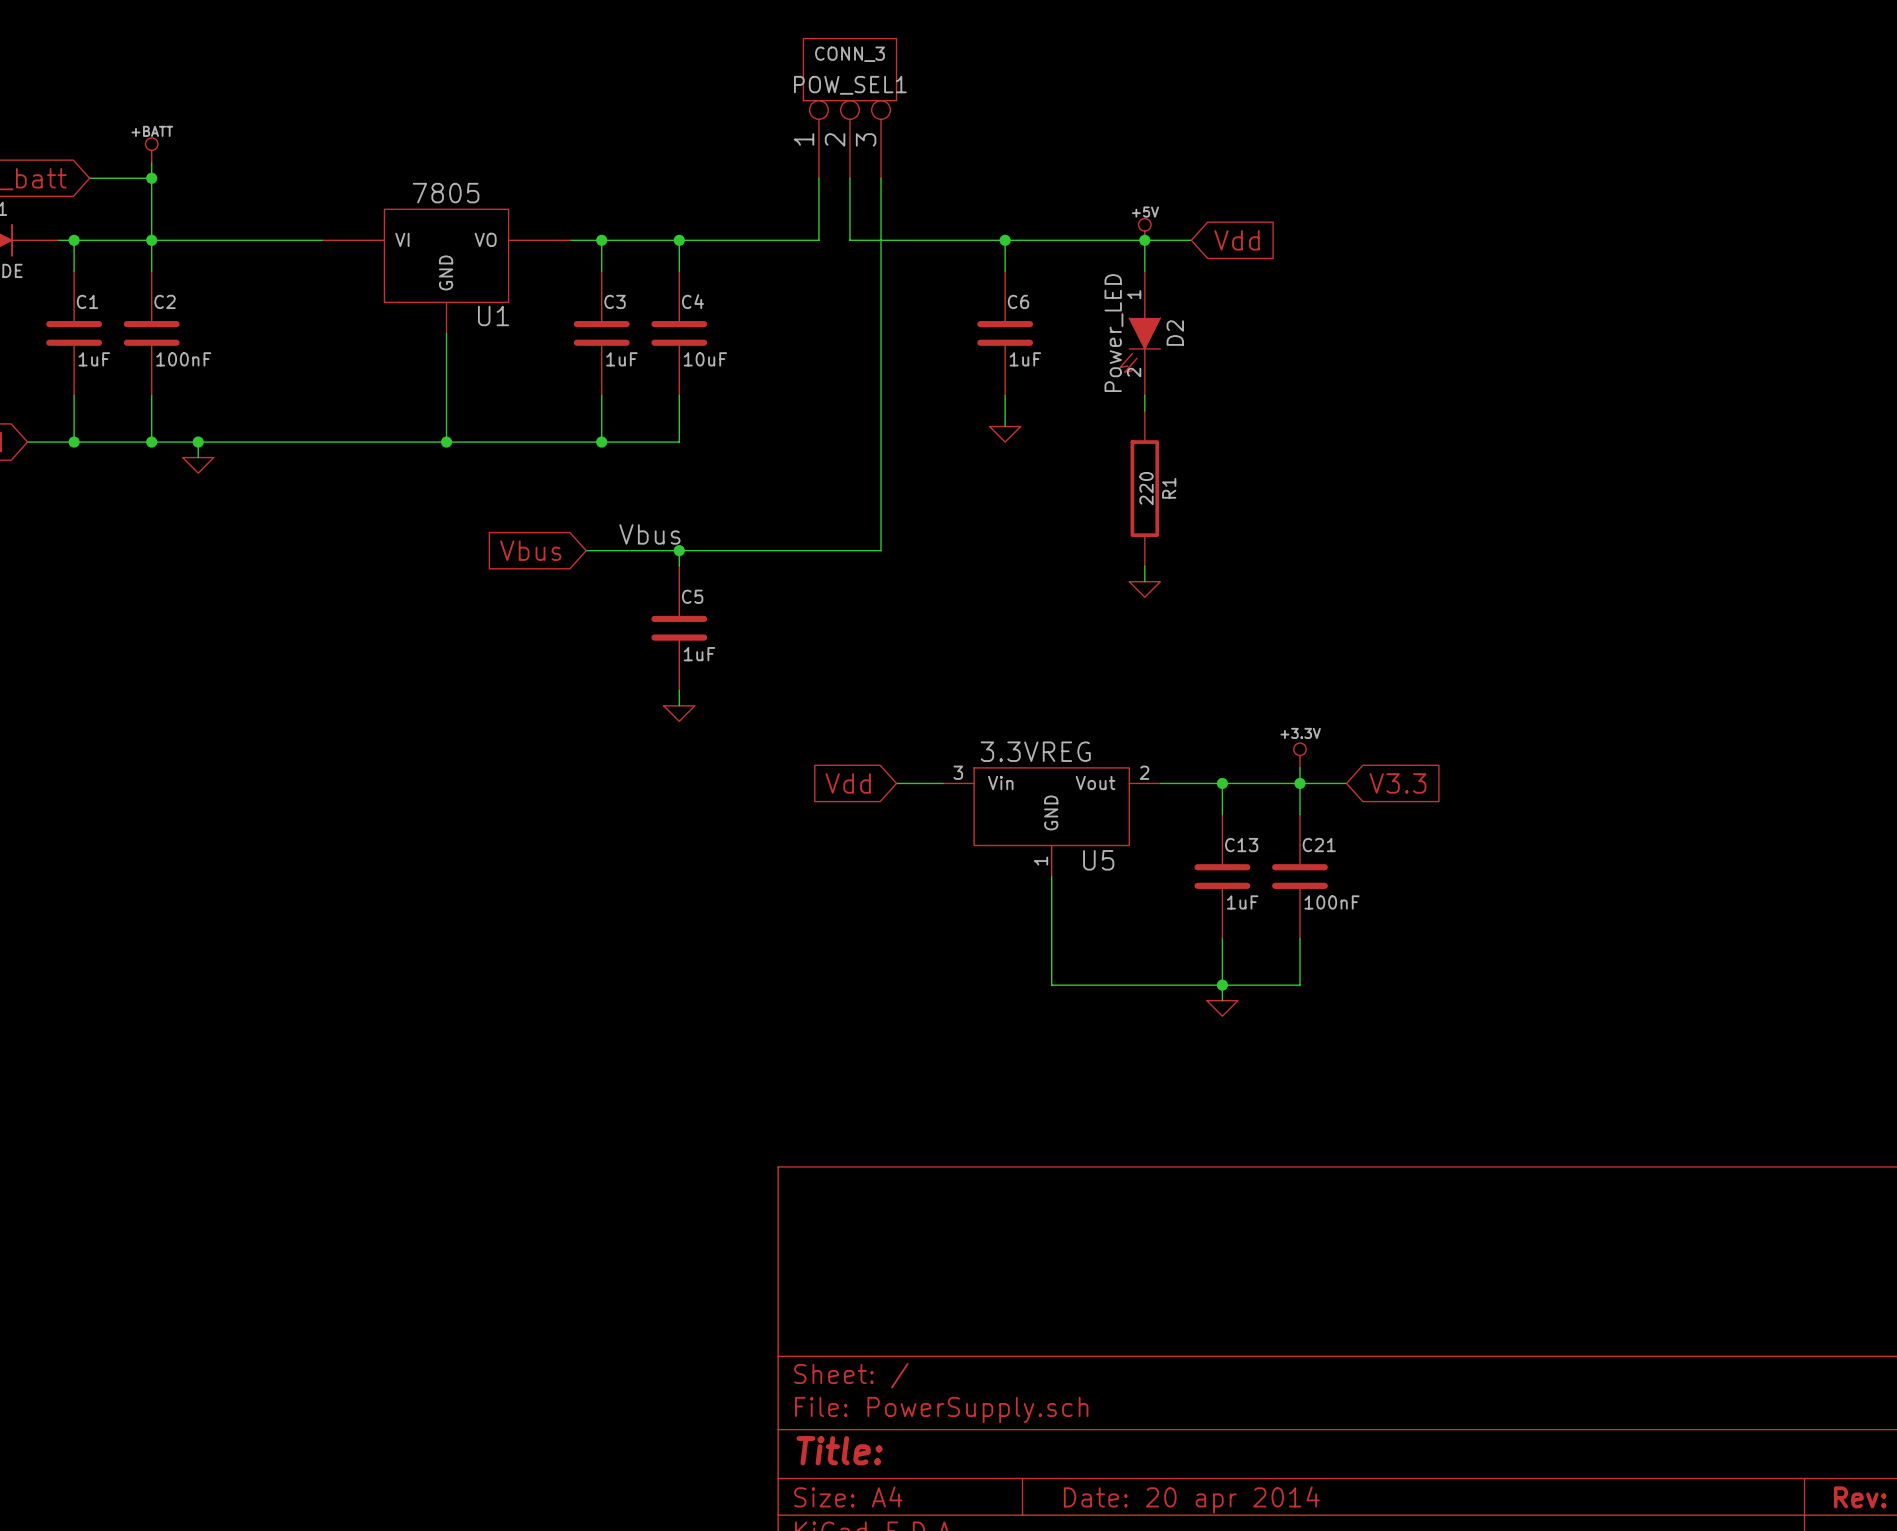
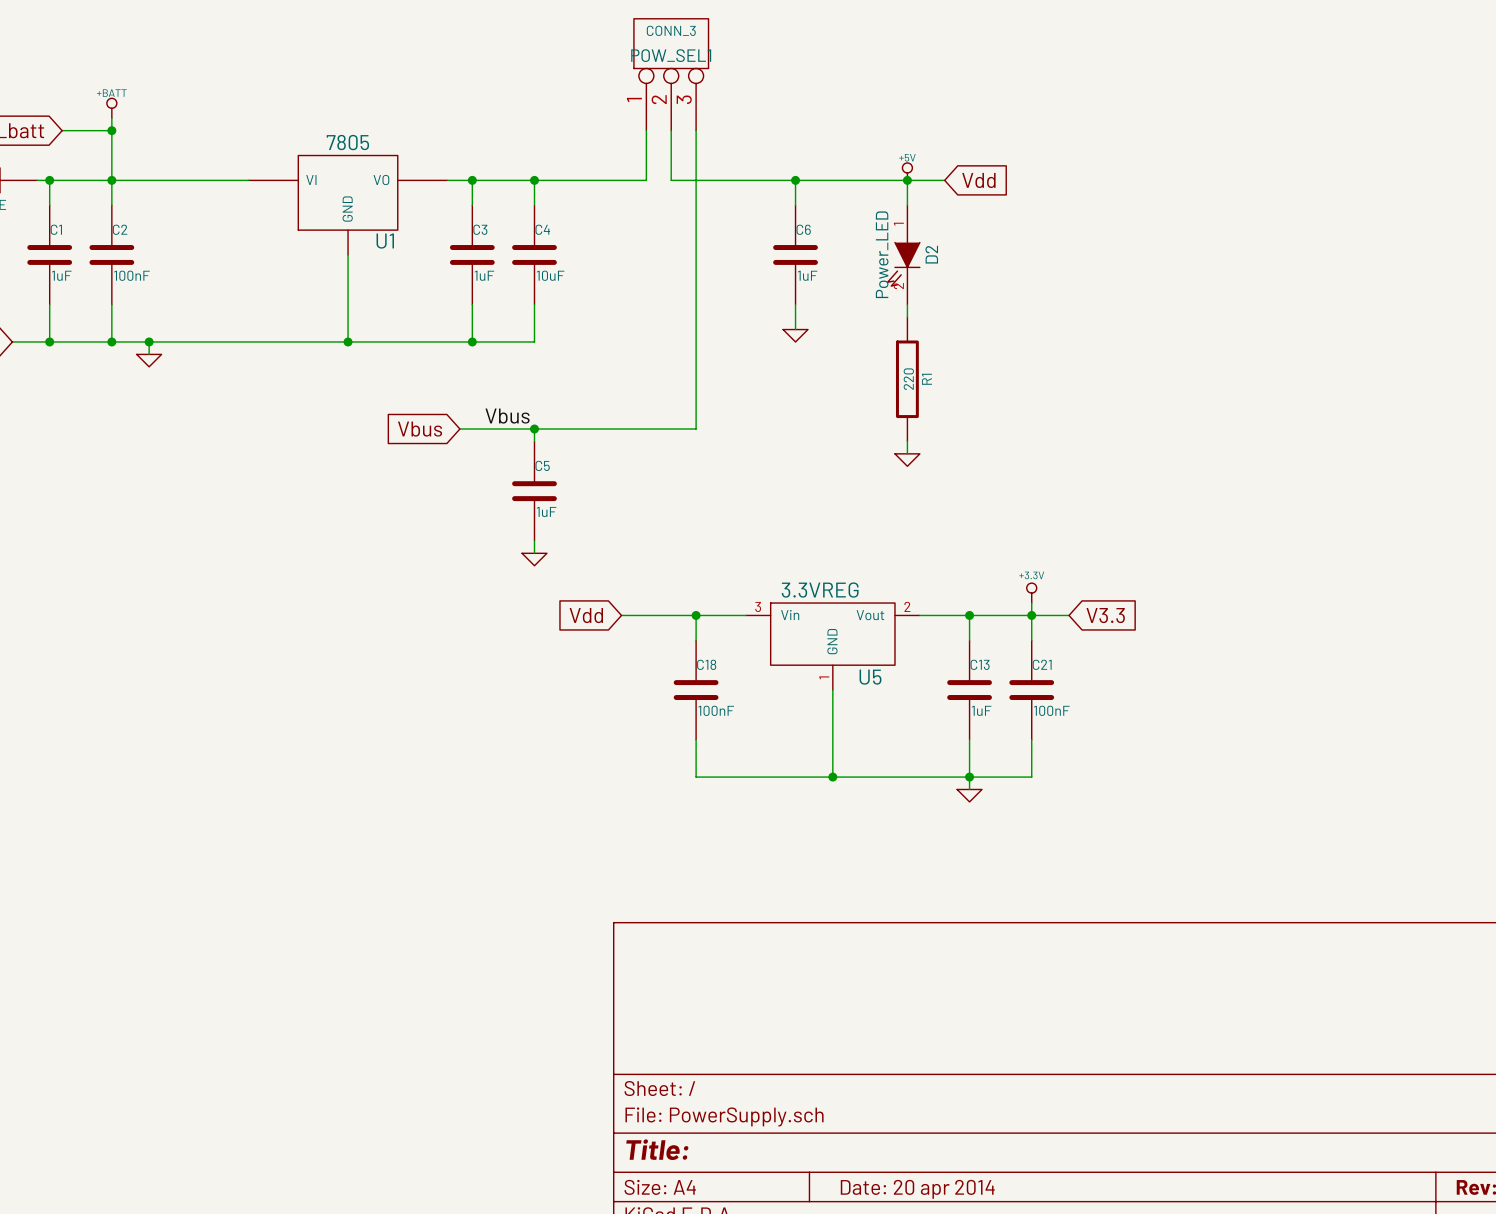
wire: none -> (621, 615) (708, 615)
global label position: Vdd (848, 783) -> Vdd (586, 615)
wire: none -> (696, 615) (696, 640)
junction: none -> (696, 615)
C18: none -> 100nF (696, 690)
wire: none -> (696, 739) (696, 777) (832, 777)
junction: none -> (832, 777)

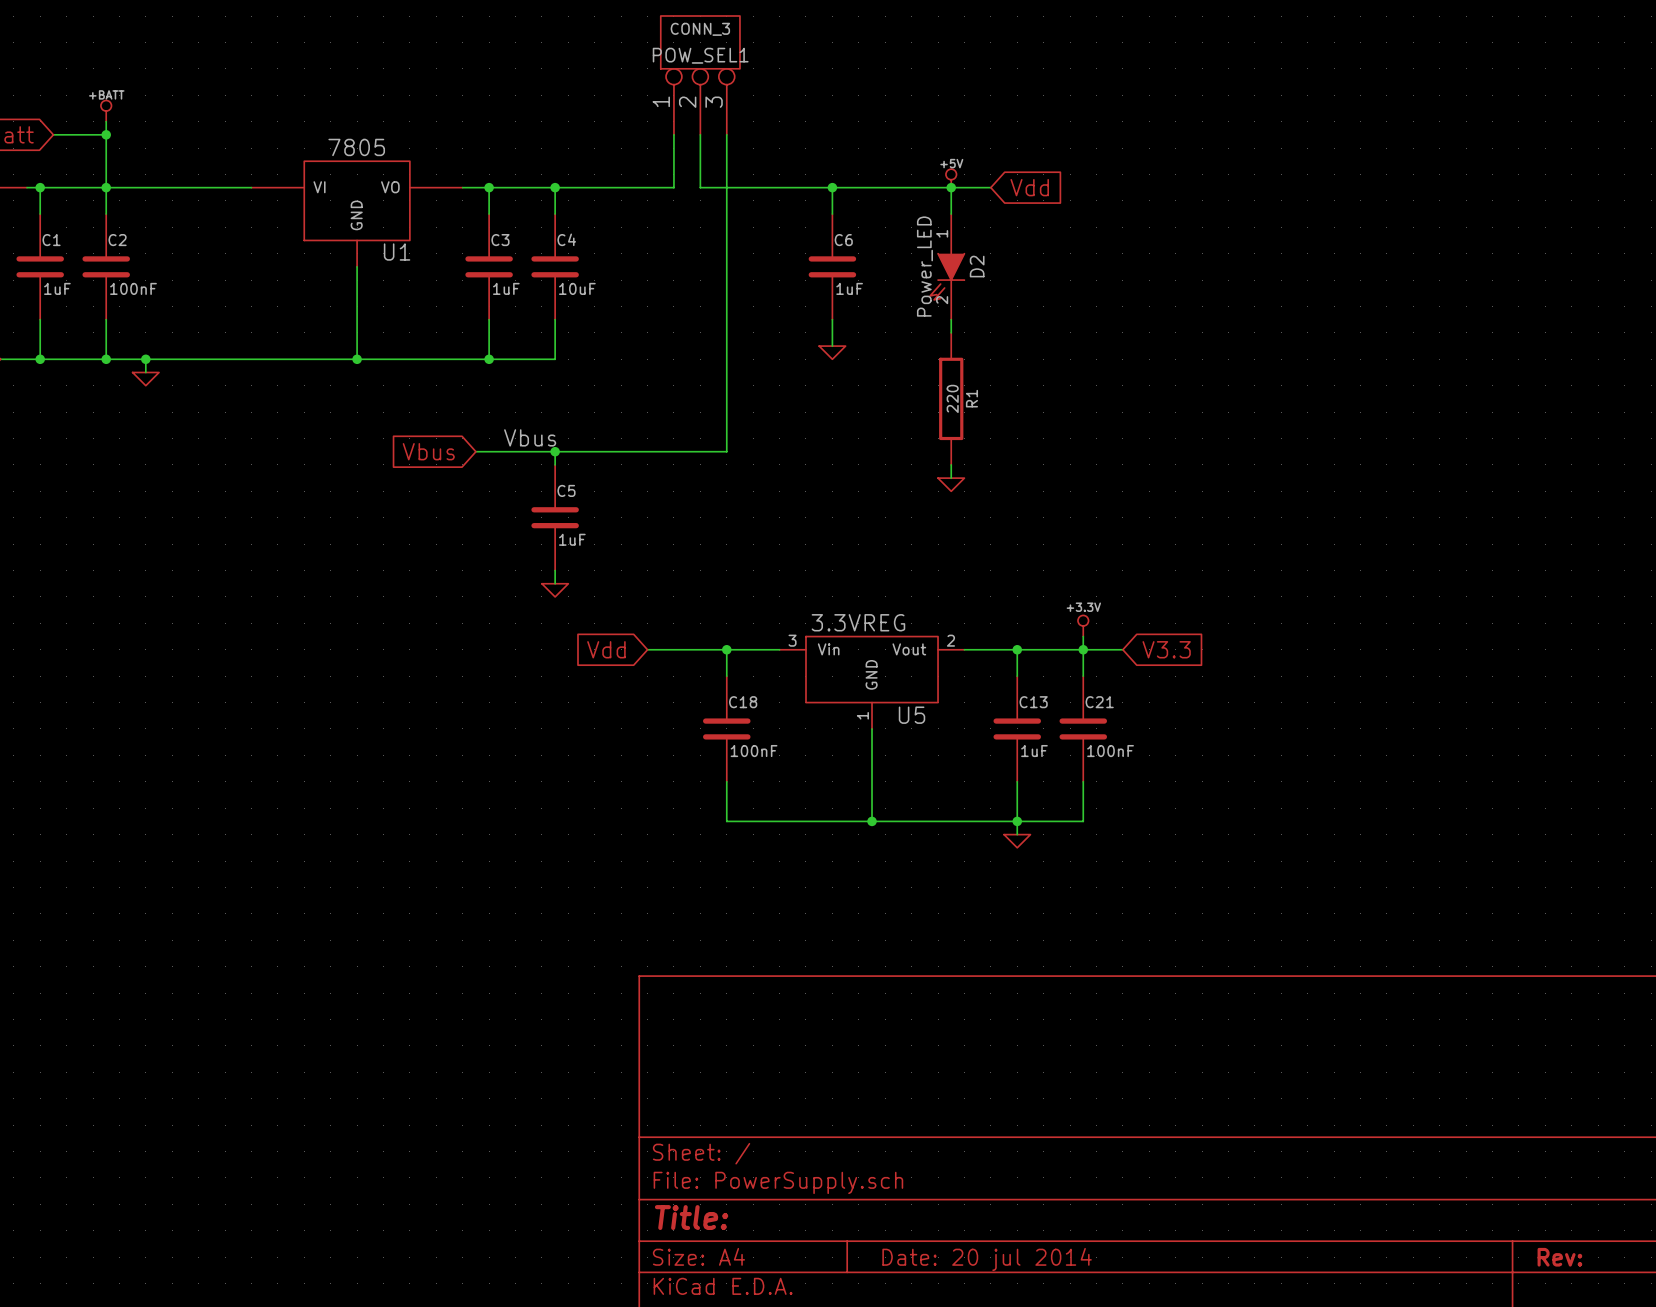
title block: Date: 20 apr 2014 (917, 1189) -> Date: 20 jul 2014 (987, 1259)

